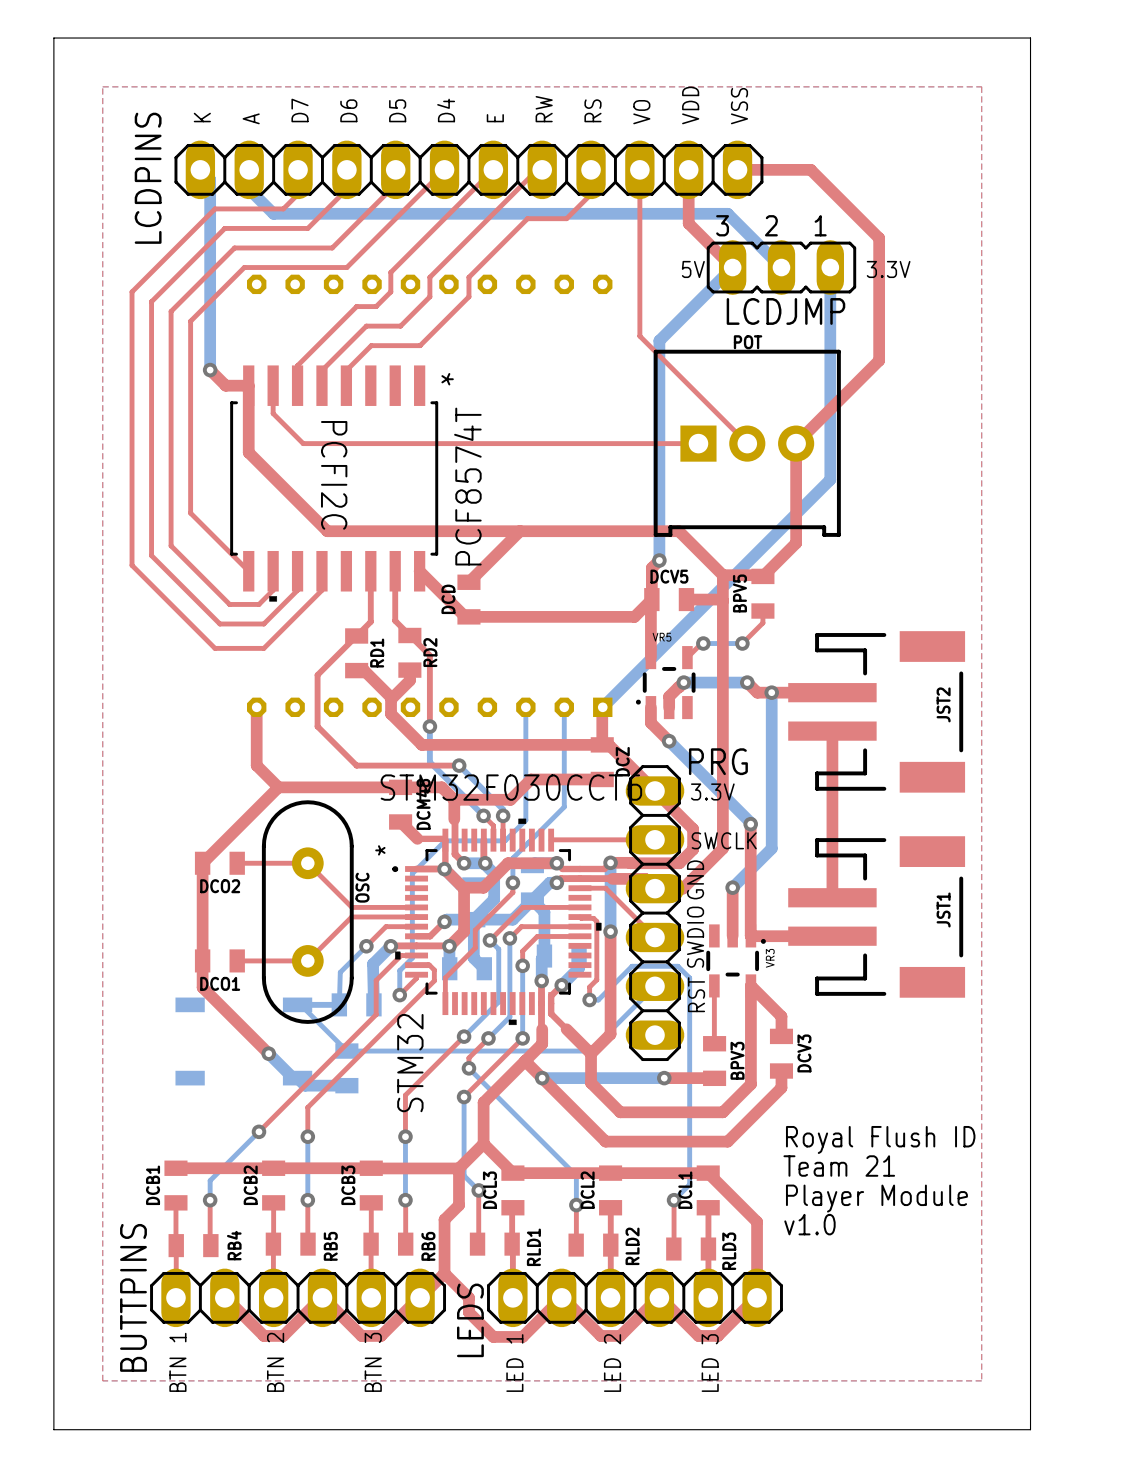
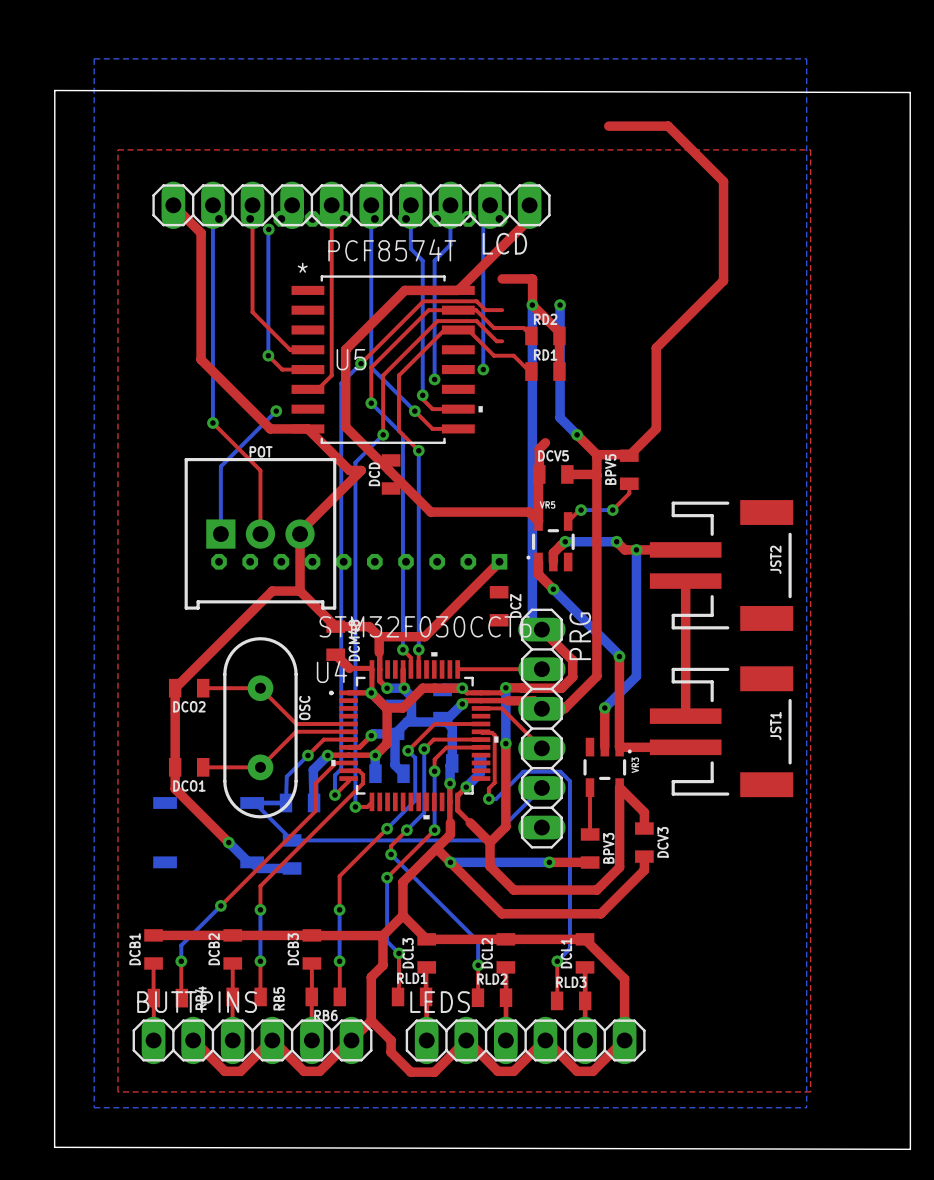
board edge: (53, 38) (1030, 38) (1030, 1429) (53, 1429) (53, 38) -> (54, 90) (54, 1147) (910, 1149) (910, 92) (54, 90)
top zone outline: (102, 86) (981, 86) (981, 1380) (102, 1380) (102, 86) -> (117, 149) (117, 1091) (810, 1091) (810, 149) (117, 149)
text: VDD (690, 105) -> none
text: VSS (739, 106) -> none
text: RW (544, 109) -> none
text: D7 (300, 110) -> none
text: D6 (348, 110) -> none
text: D5 (397, 110) -> none
text: D4 (446, 110) -> none
text: RS (592, 110) -> none
text: VO (641, 112) -> none
text: K (202, 117) -> none
text: A (251, 118) -> none
text: E (495, 118) -> none
bottom track: (200, 169) (210, 179) (210, 370) -> none
bottom track: (249, 169) (249, 189) (273, 213) (727, 213) (781, 267) -> none
top track: (298, 169) (298, 194) (283, 208) (215, 208) (132, 291) (132, 565) (215, 648) (263, 648) (321, 590) (321, 571) -> none
top track: (346, 169) (346, 189) (307, 228) (224, 228) (151, 301) (151, 555) (219, 623) (263, 623) (297, 590) (297, 571) -> none
top track: (395, 169) (395, 184) (332, 247) (234, 247) (171, 311) (171, 545) (229, 604) (258, 604) (273, 590) (273, 571) -> none
top track: (444, 169) (346, 267) (244, 267) (190, 321) (190, 513) (248, 571) -> none
LCDPINS: (468, 169) -> none
top track: (493, 169) (390, 272) (390, 291) (376, 306) (356, 306) (297, 365) (297, 385) -> none
top track: (542, 169) (537, 169) (429, 277) (429, 296) (400, 326) (366, 326) (321, 370) (321, 385) -> none
top track: (591, 169) (591, 194) (566, 218) (527, 218) (468, 277) (468, 296) (420, 345) (371, 345) (346, 370) (346, 385) -> none
top track: (639, 169) (639, 267) -> none
top track: (688, 169) (688, 223) (732, 267) -> none
top track: none -> (173, 205) (201, 233) (201, 359) (270, 428) (307, 428) (349, 470) (361, 470) (300, 531) (300, 591)
bottom track: none -> (212, 205) (212, 423)
top track: none -> (252, 205) (252, 312) (290, 349) (307, 349)
top track: none -> (331, 205) (331, 375) (317, 389) (307, 389)
LCD: none -> (351, 205)
bottom track: none -> (371, 205) (371, 367) (414, 411)
bottom track: none -> (410, 205) (410, 248) (422, 260) (422, 395)
bottom track: none -> (450, 205) (450, 244) (434, 260) (434, 379)
bottom track: none -> (490, 205) (483, 212) (483, 369)
bottom track: (732, 267) (659, 340) (659, 560) -> none
LCDJMP: (781, 267) -> none
bottom track: (830, 267) (830, 479) (602, 707) -> none
text: 5V (693, 269) -> none
text: 3.3V (888, 269) -> none
top track: (639, 284) (639, 336) (747, 443) -> (529, 219) (458, 290) (404, 290) (345, 349) (345, 426) (430, 512) (529, 512) (538, 521)
bottom track: none -> (268, 229) (268, 355)
via: none -> (268, 229)
top track: none -> (502, 278) (532, 279) (532, 305) (559, 332) (559, 371)
top track: (210, 370) (225, 385) (248, 385) (248, 452) (327, 531) (678, 531) (698, 550) -> none
via: (210, 370) -> none
top track: (273, 385) (273, 413) (303, 443) (698, 443) -> none
bottom track: none -> (532, 305) (532, 620) (541, 629)
via: none -> (532, 305)
bottom track: none -> (560, 305) (560, 417) (577, 434)
via: none -> (560, 305)
top track: none -> (502, 310) (485, 310) (476, 301) (423, 301) (361, 363)
top track: none -> (531, 335) (523, 328) (493, 328) (476, 310) (428, 310) (371, 367) (371, 403)
top track: none -> (502, 341) (496, 341) (476, 321) (437, 321) (383, 375) (383, 434)
POT: (747, 443) -> none
top track: none -> (268, 355) (282, 369) (307, 369)
via: none -> (268, 355)
U5: none -> (387, 359)
via: none -> (361, 363)
via: none -> (483, 369)
top track: none -> (531, 371) (513, 355) (493, 355) (468, 329) (444, 329) (398, 375) (398, 430) (418, 450)
via: none -> (434, 379)
PCFI2C: (334, 483) -> none
top track: none -> (422, 395) (422, 399) (432, 409) (458, 409)
via: none -> (422, 395)
via: none -> (371, 403)
bottom track: none -> (276, 411) (220, 466) (220, 534)
via: none -> (276, 411)
top track: none -> (414, 411) (432, 428) (458, 428)
via: none -> (414, 411)
top track: (520, 531) (468, 582) -> none
top track: none -> (212, 423) (260, 470) (260, 534)
via: none -> (212, 423)
bottom track: none -> (383, 434) (355, 462) (355, 806)
via: none -> (383, 434)
via position: (659, 560) -> (577, 434)
via: none -> (418, 450)
top track: (370, 571) (370, 621) (317, 675) (317, 726) (356, 765) (459, 765) -> none
top track: (395, 571) (395, 620) (429, 655) (429, 726) -> none
top track: (419, 571) (465, 616) (634, 616) (650, 600) -> none
RD2 rotation: 0° (409, 652) -> 90° clockwise (545, 335)
RD2 position: (409, 652) -> (545, 335)
RD1 rotation: 0° (356, 653) -> 90° clockwise (545, 371)
RD1 position: (356, 653) -> (545, 371)
top track: (409, 670) (409, 680) (392, 698) (364, 670) (356, 670) -> none
POT: none -> (260, 533)
top track: (391, 697) (391, 713) (421, 744) (608, 744) (655, 790) -> none
top track: (256, 707) (256, 765) (278, 787) (400, 787) -> (300, 591) (335, 626)
bottom track: (525, 707) (525, 820) (505, 840) (445, 840) (412, 873) (412, 958) (407, 962) -> (361, 363) (341, 383) (341, 769)
bottom track: (564, 707) (564, 806) (512, 858) (512, 882) -> none
top track: (602, 707) (602, 744) -> none
bottom track: (429, 726) (429, 762) (483, 815) -> (371, 403) (402, 434) (402, 649)
via: (429, 726) -> none
top track: none -> (300, 591) (272, 591) (236, 626)
PRG name rotation: 0° (718, 761) -> 90° counterclockwise (580, 636)
bottom track: (459, 765) (503, 809) -> (418, 450) (418, 644)
via: (459, 765) -> none
top track: (530, 779) (602, 779) -> (441, 620) (502, 559)
text: 3.3V (712, 791) -> none
text: SWCLK (724, 840) -> none
text: * (380, 850) -> none
text: GND (695, 879) -> none
top track: (512, 882) (512, 892) (475, 930) (475, 948) (445, 977) (445, 1003) -> (355, 806) (367, 806) (371, 801)
via: (512, 882) -> none
bottom track: (556, 882) (549, 882) (512, 919) (473, 919) -> (462, 704) (444, 722) (406, 722)
text: SWDIO (695, 937) -> none
text: RST (696, 994) -> none
via: none -> (355, 806)
STM32 name: STM32 (410, 1063) -> U4 (332, 671)
text: Royal Flush ID (880, 1139) -> none
text: Team 21 (839, 1166) -> none
text: Player Module (876, 1198) -> none
text: v1.0 (809, 1224) -> none
RB6 name rotation: 0° (428, 1246) -> 90° clockwise (325, 1015)
RB6 name position: RB6 (428, 1246) -> RB6 (325, 1015)
RLD2 name rotation: 0° (632, 1246) -> 90° clockwise (492, 979)
RLD1 name rotation: 0° (533, 1247) -> 90° clockwise (412, 978)
RLD3 name rotation: 0° (729, 1251) -> 90° clockwise (571, 982)
BUTTPINS name rotation: 0° (133, 1297) -> 90° clockwise (197, 1002)
LEDS name rotation: 0° (470, 1320) -> 90° clockwise (440, 1002)
text: BTN 1 (177, 1362) -> none
text: BTN 2 (275, 1362) -> none
text: BTN 3 (373, 1362) -> none
text: LED 1 (514, 1363) -> none
text: LED 2 (612, 1363) -> none
text: LED 3 (710, 1363) -> none

